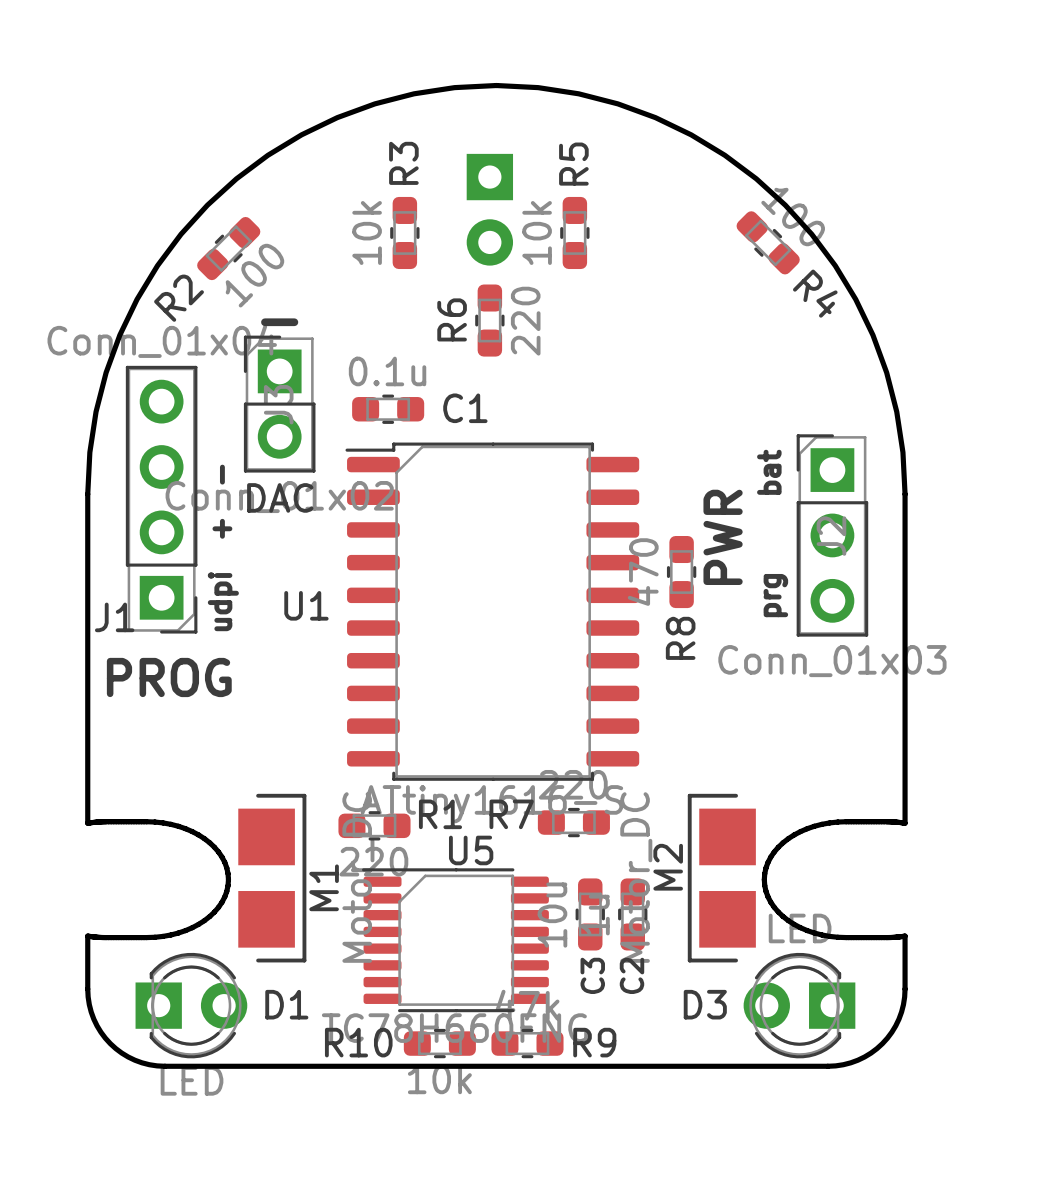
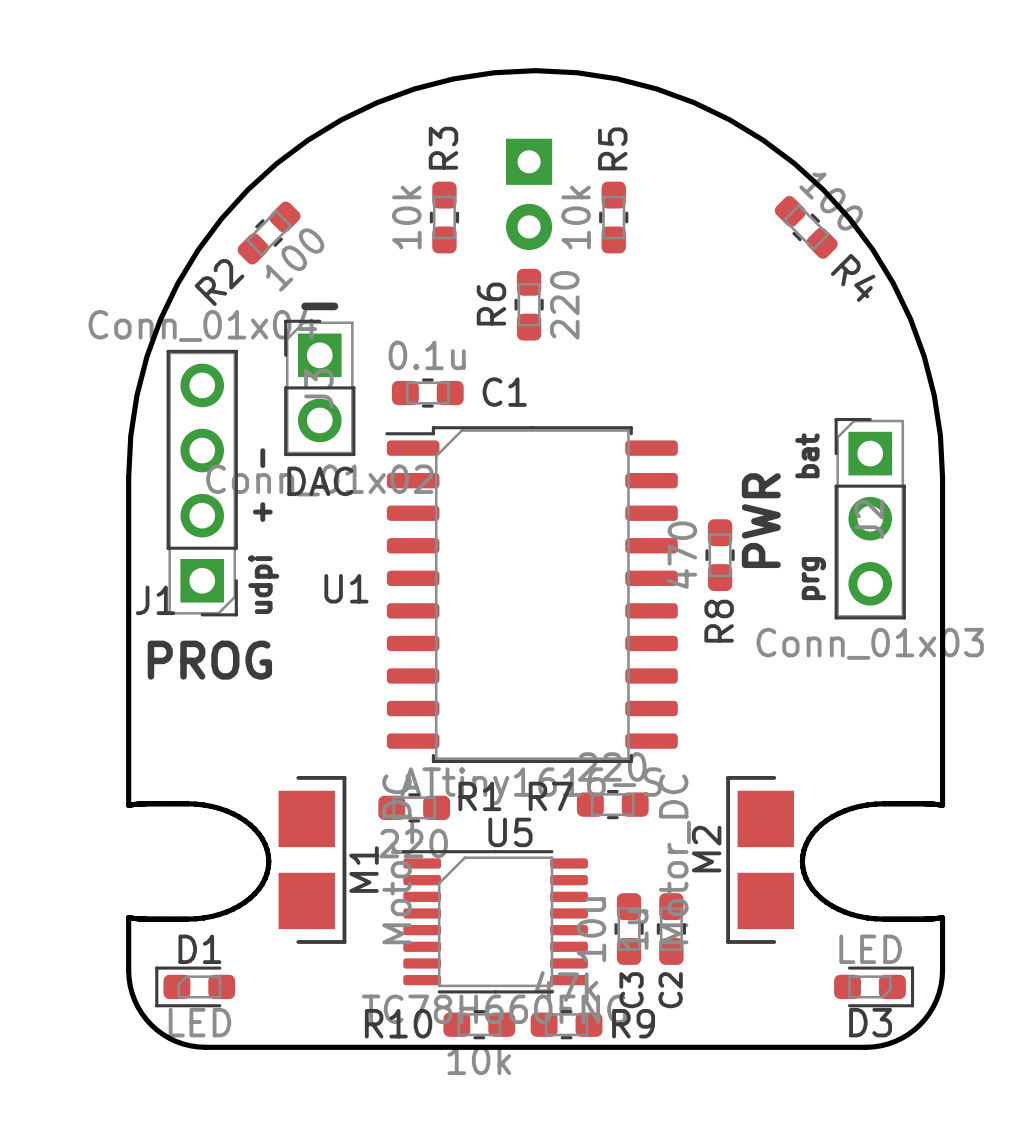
C3 position: (590, 914) -> (629, 929)
C2 position: (632, 914) -> (671, 929)
D1 footprint: [135, 952, 248, 1059] -> [155, 966, 236, 1008]
D3 footprint: [743, 952, 856, 1059] -> [834, 966, 915, 1008]
D1 name position: D1 (286, 1004) -> D1 (199, 949)
D3 name position: D3 (705, 1004) -> D3 (870, 1022)

